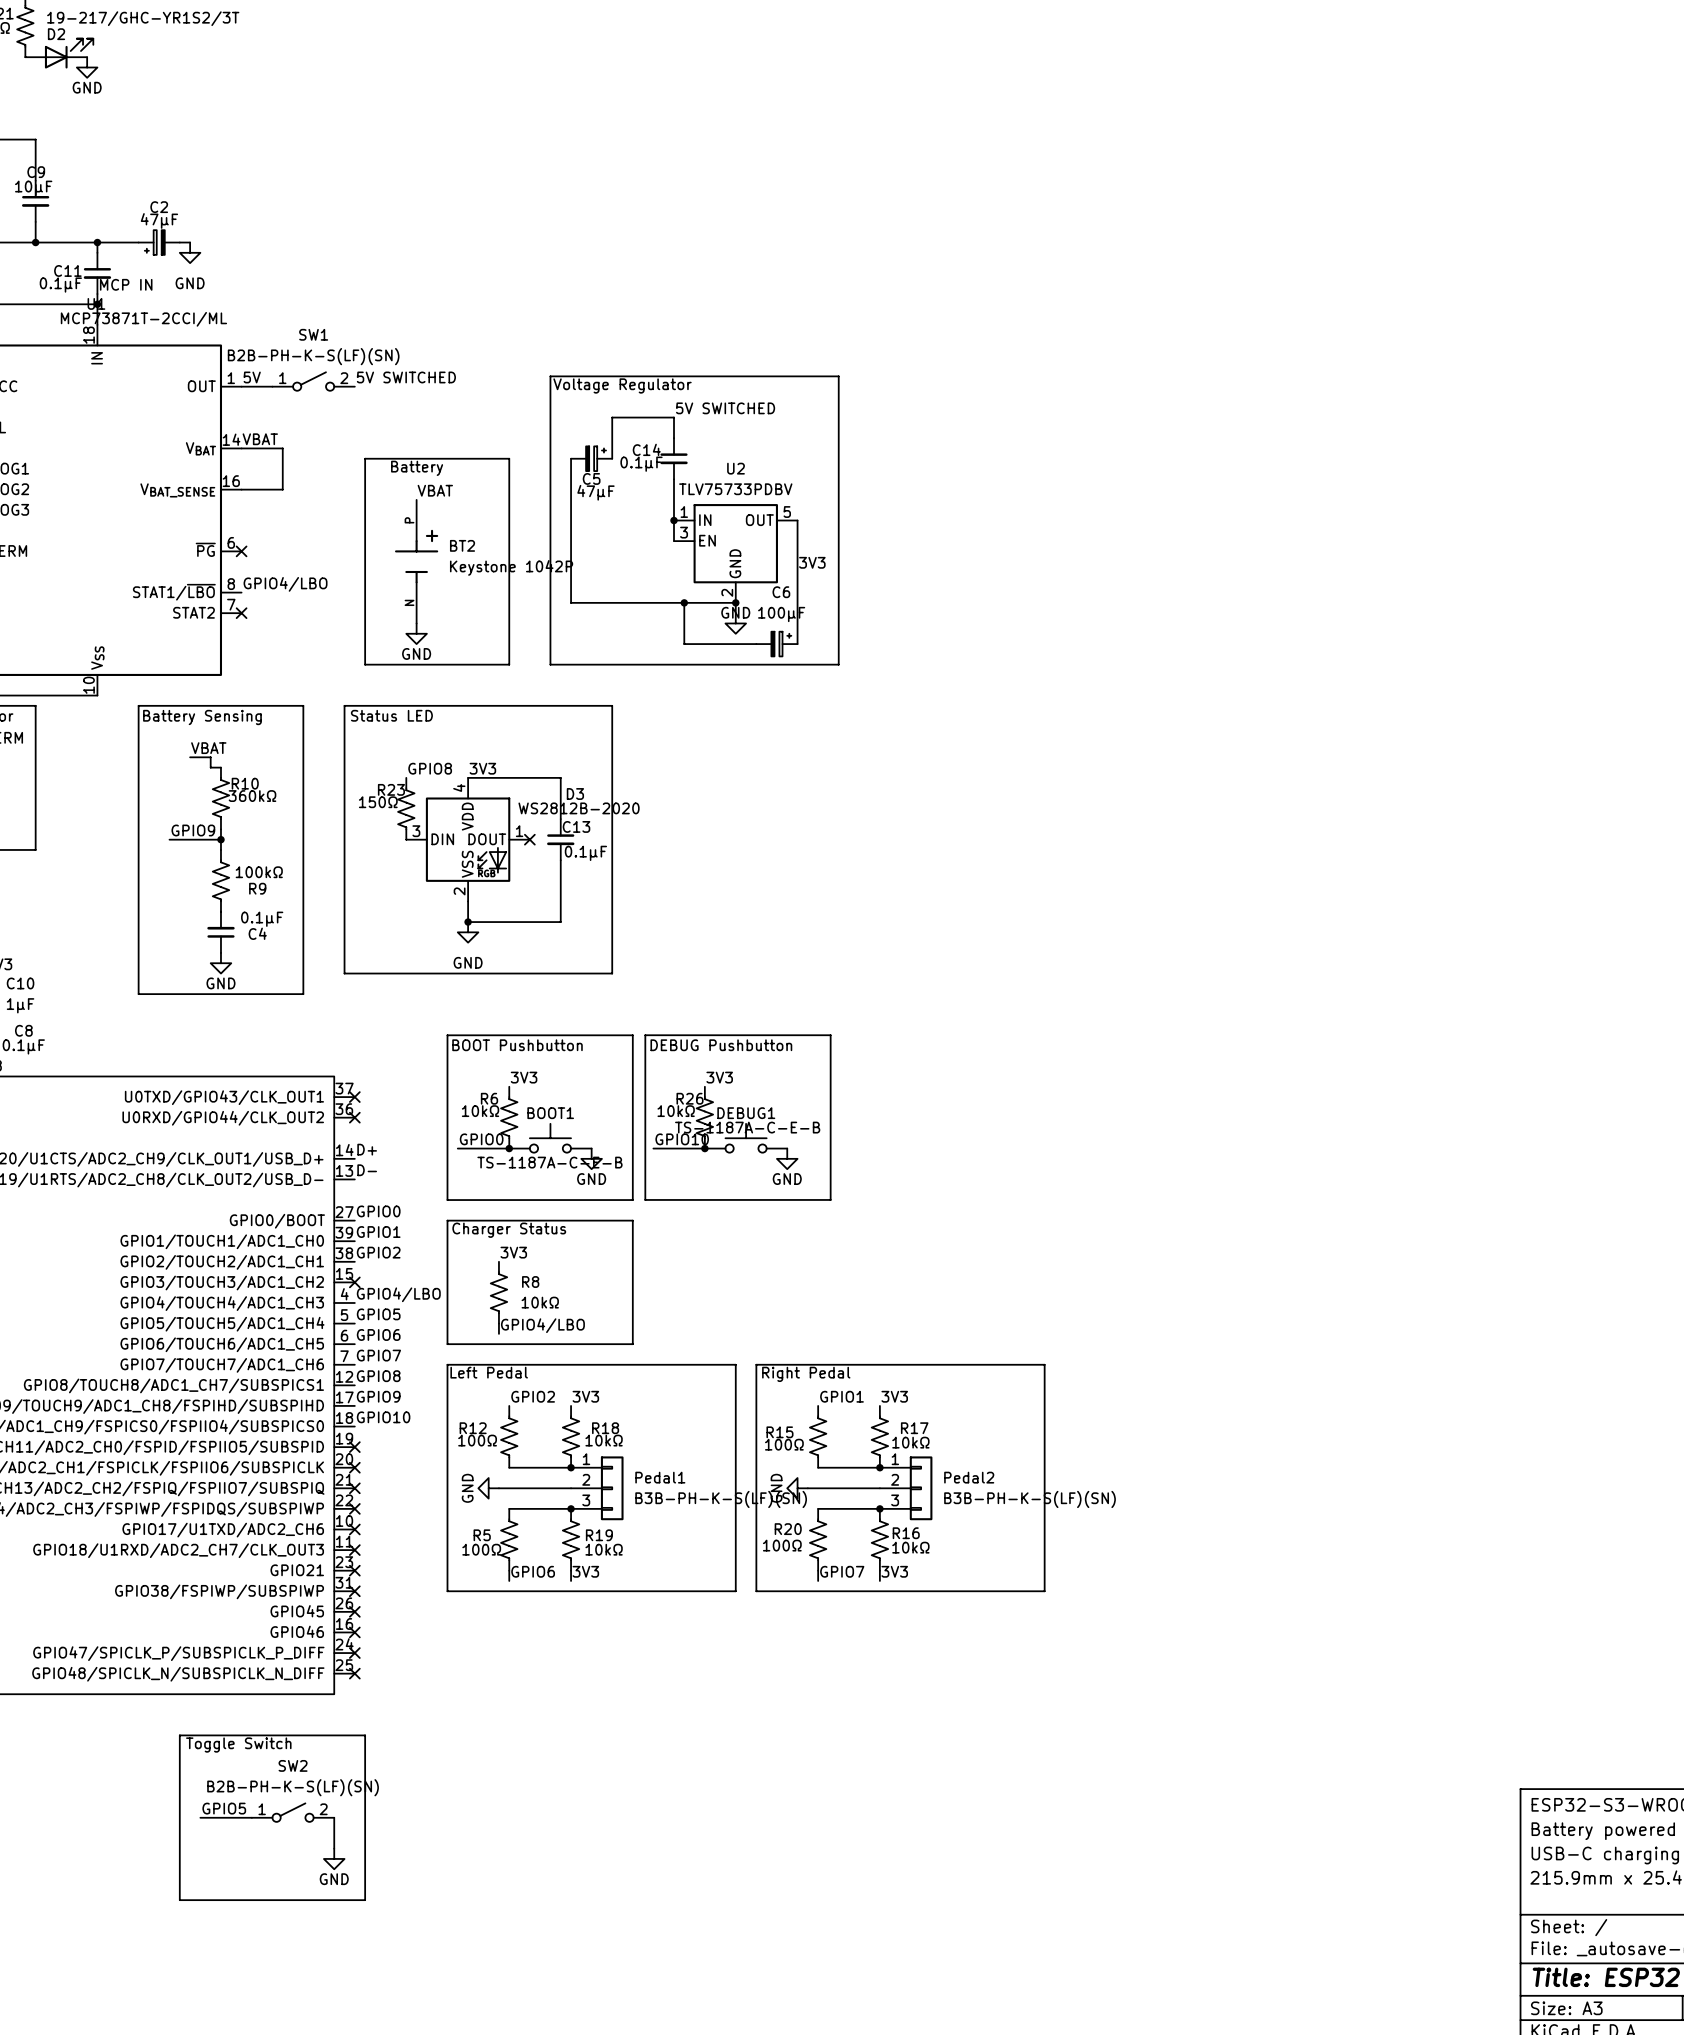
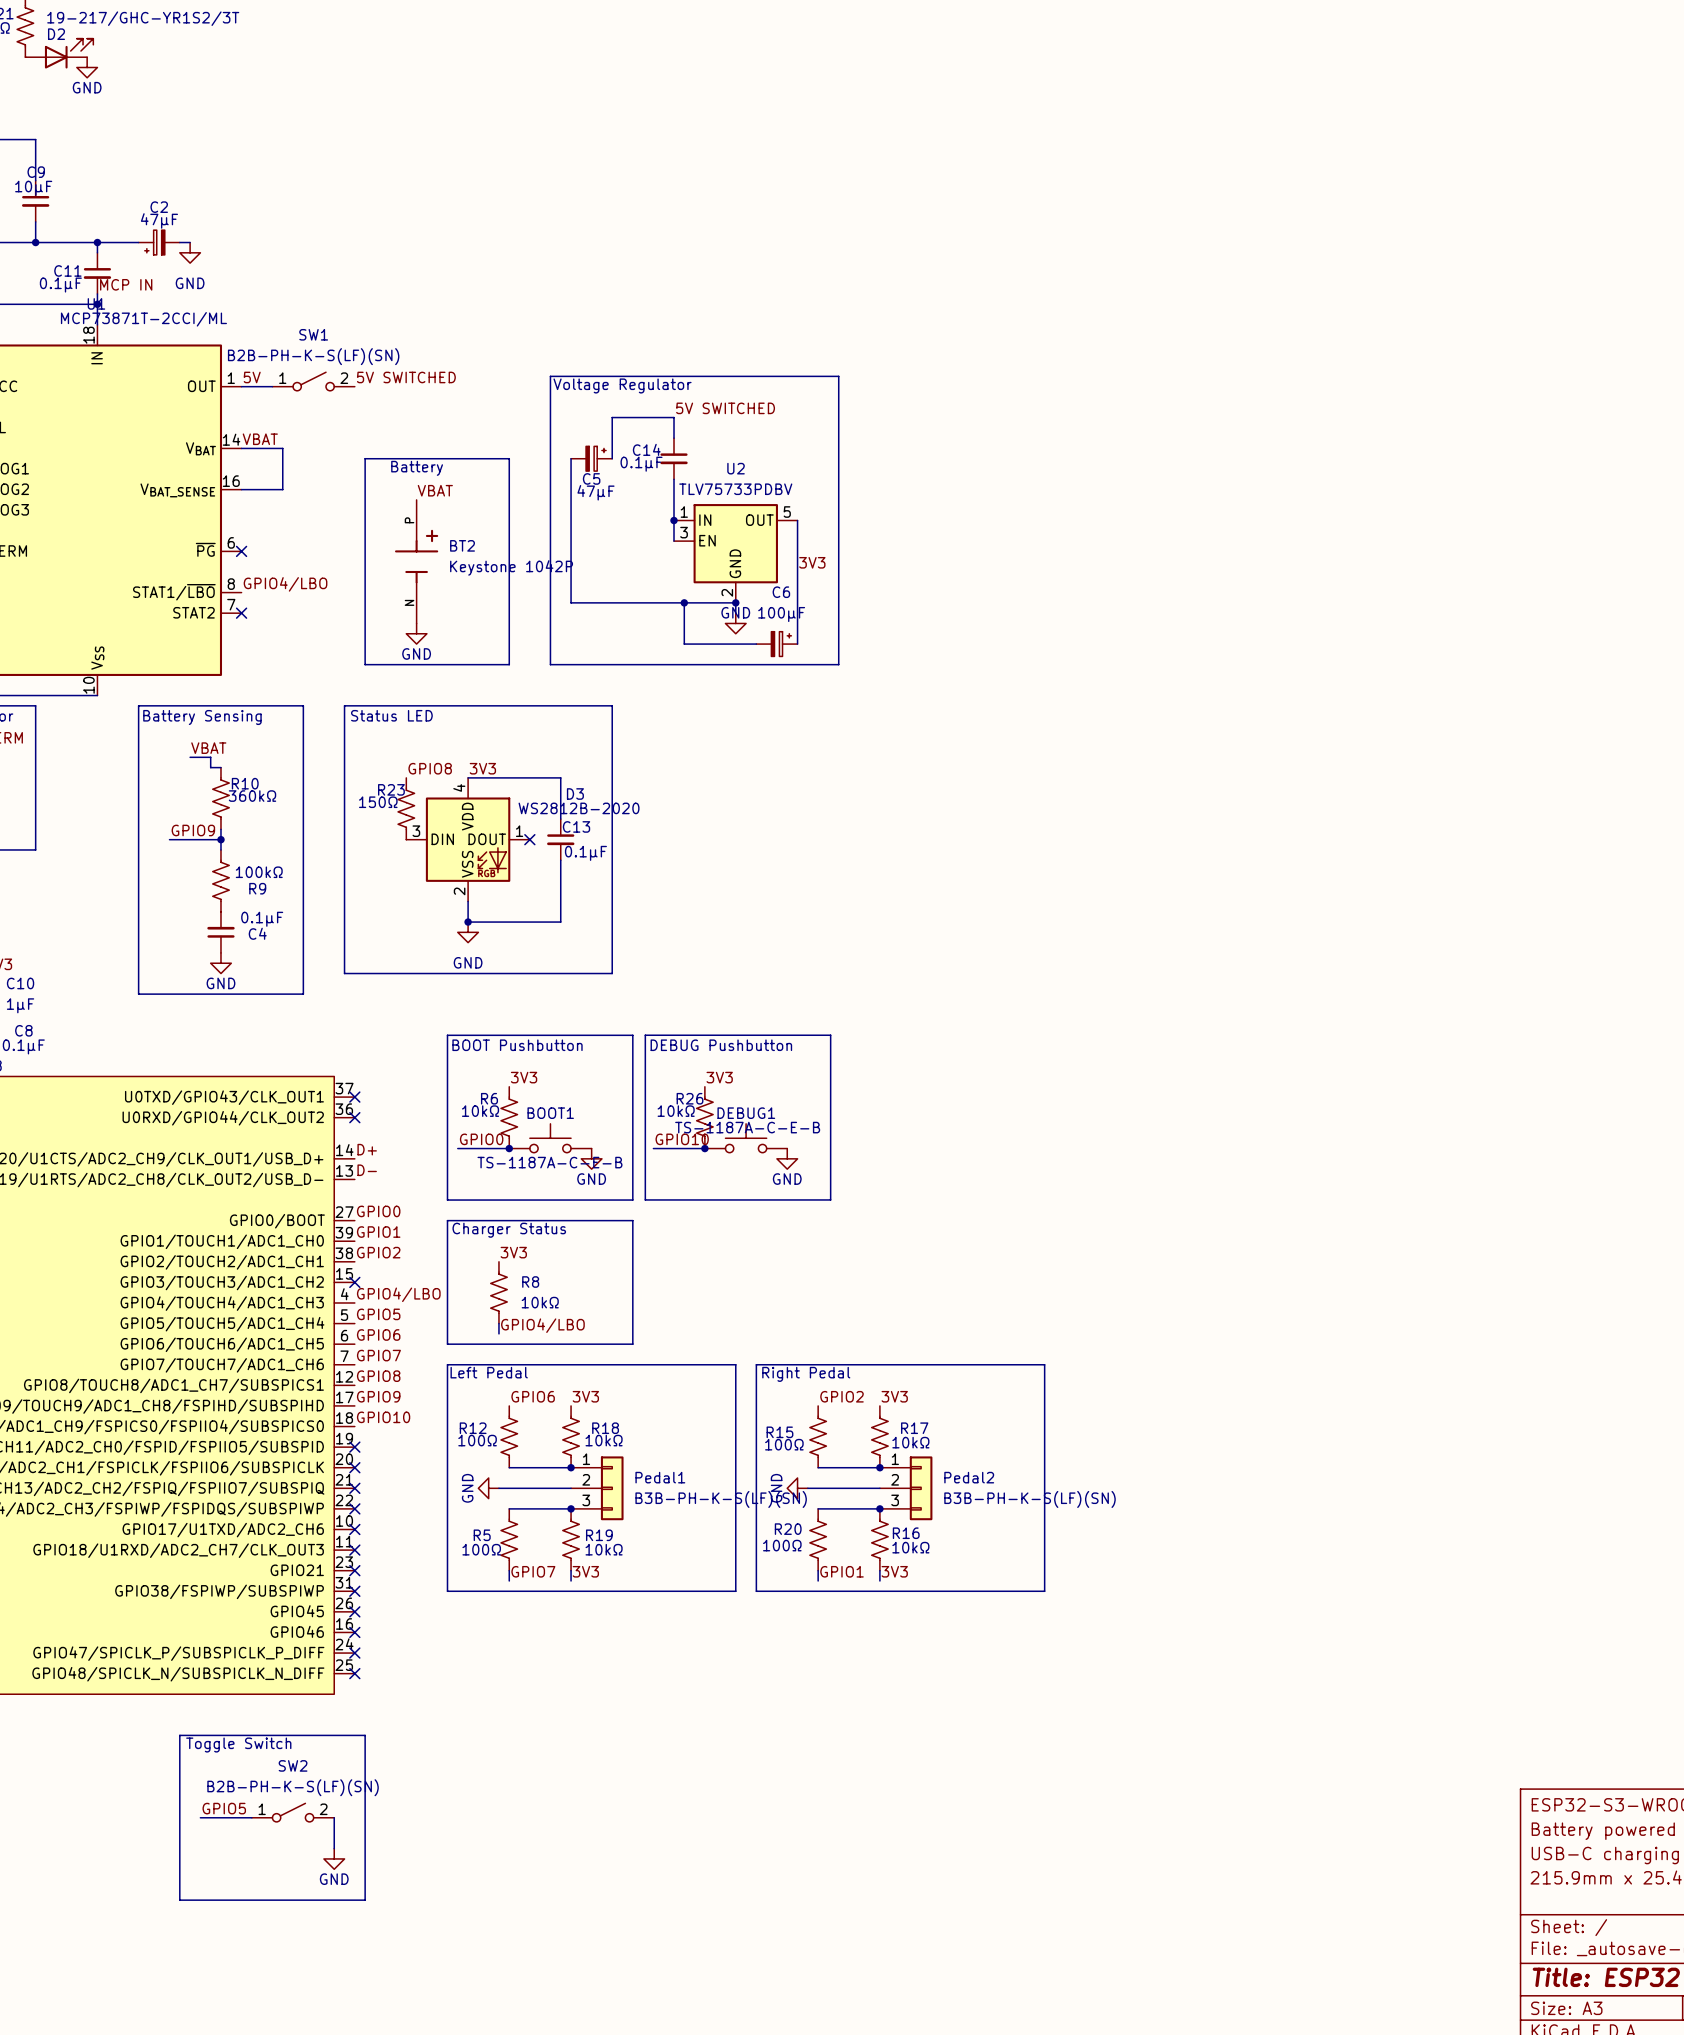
label: GPIO2 (533, 1396) -> GPIO6 (533, 1396)
label: GPIO1 (841, 1396) -> GPIO2 (841, 1396)
label: GPIO6 (533, 1571) -> GPIO7 (533, 1571)
label: GPIO7 (842, 1571) -> GPIO1 (841, 1571)

